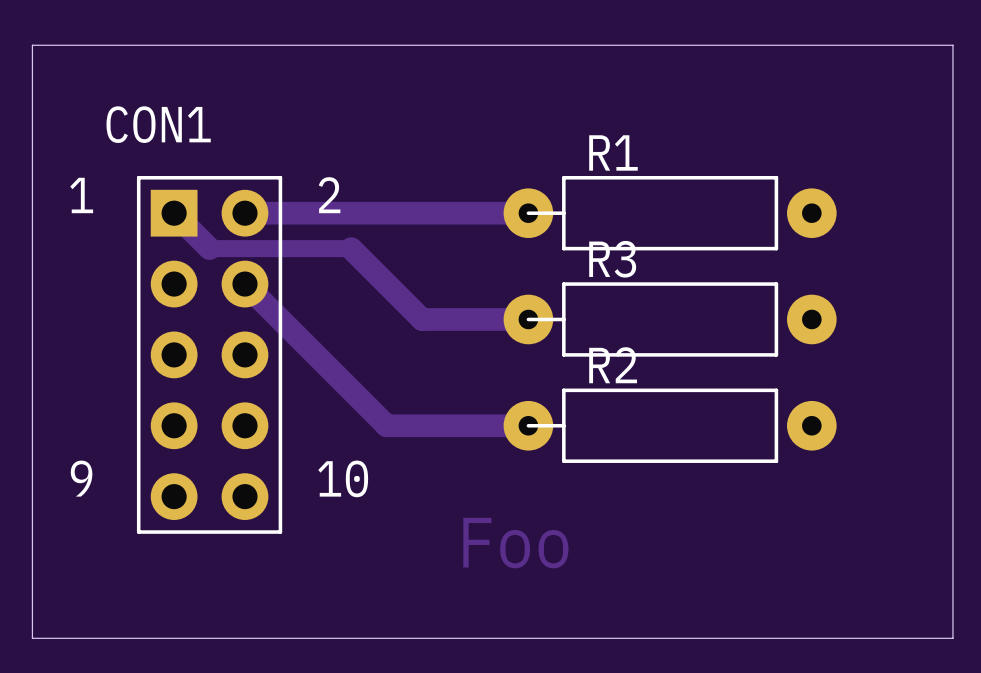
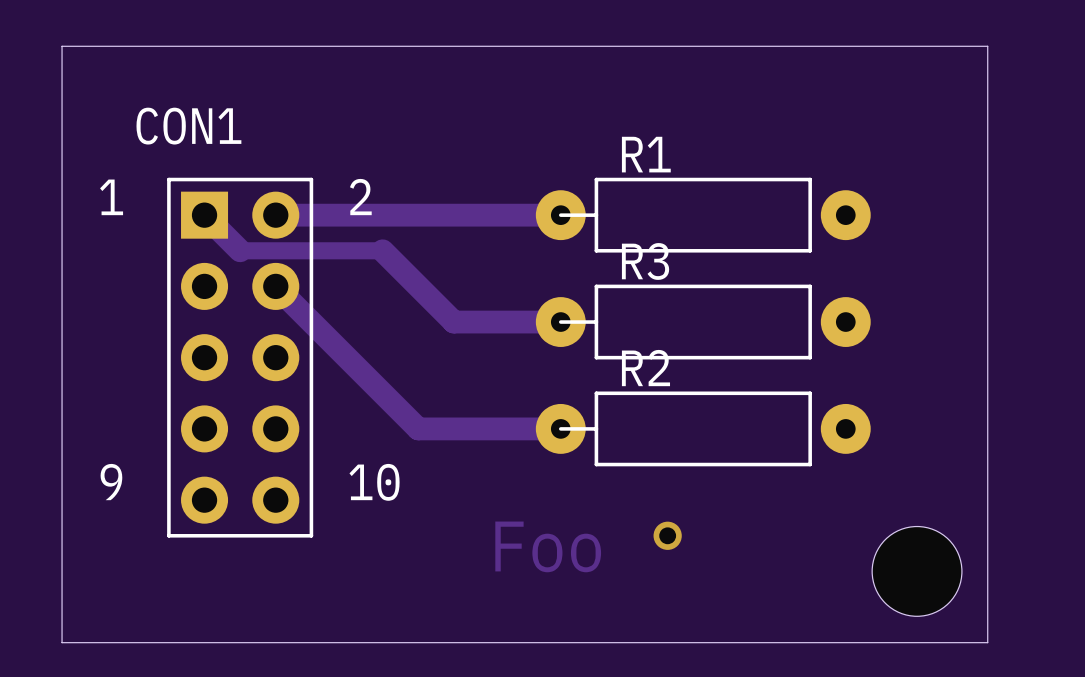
via: none -> (667, 535)
hole: none -> (917, 571)

